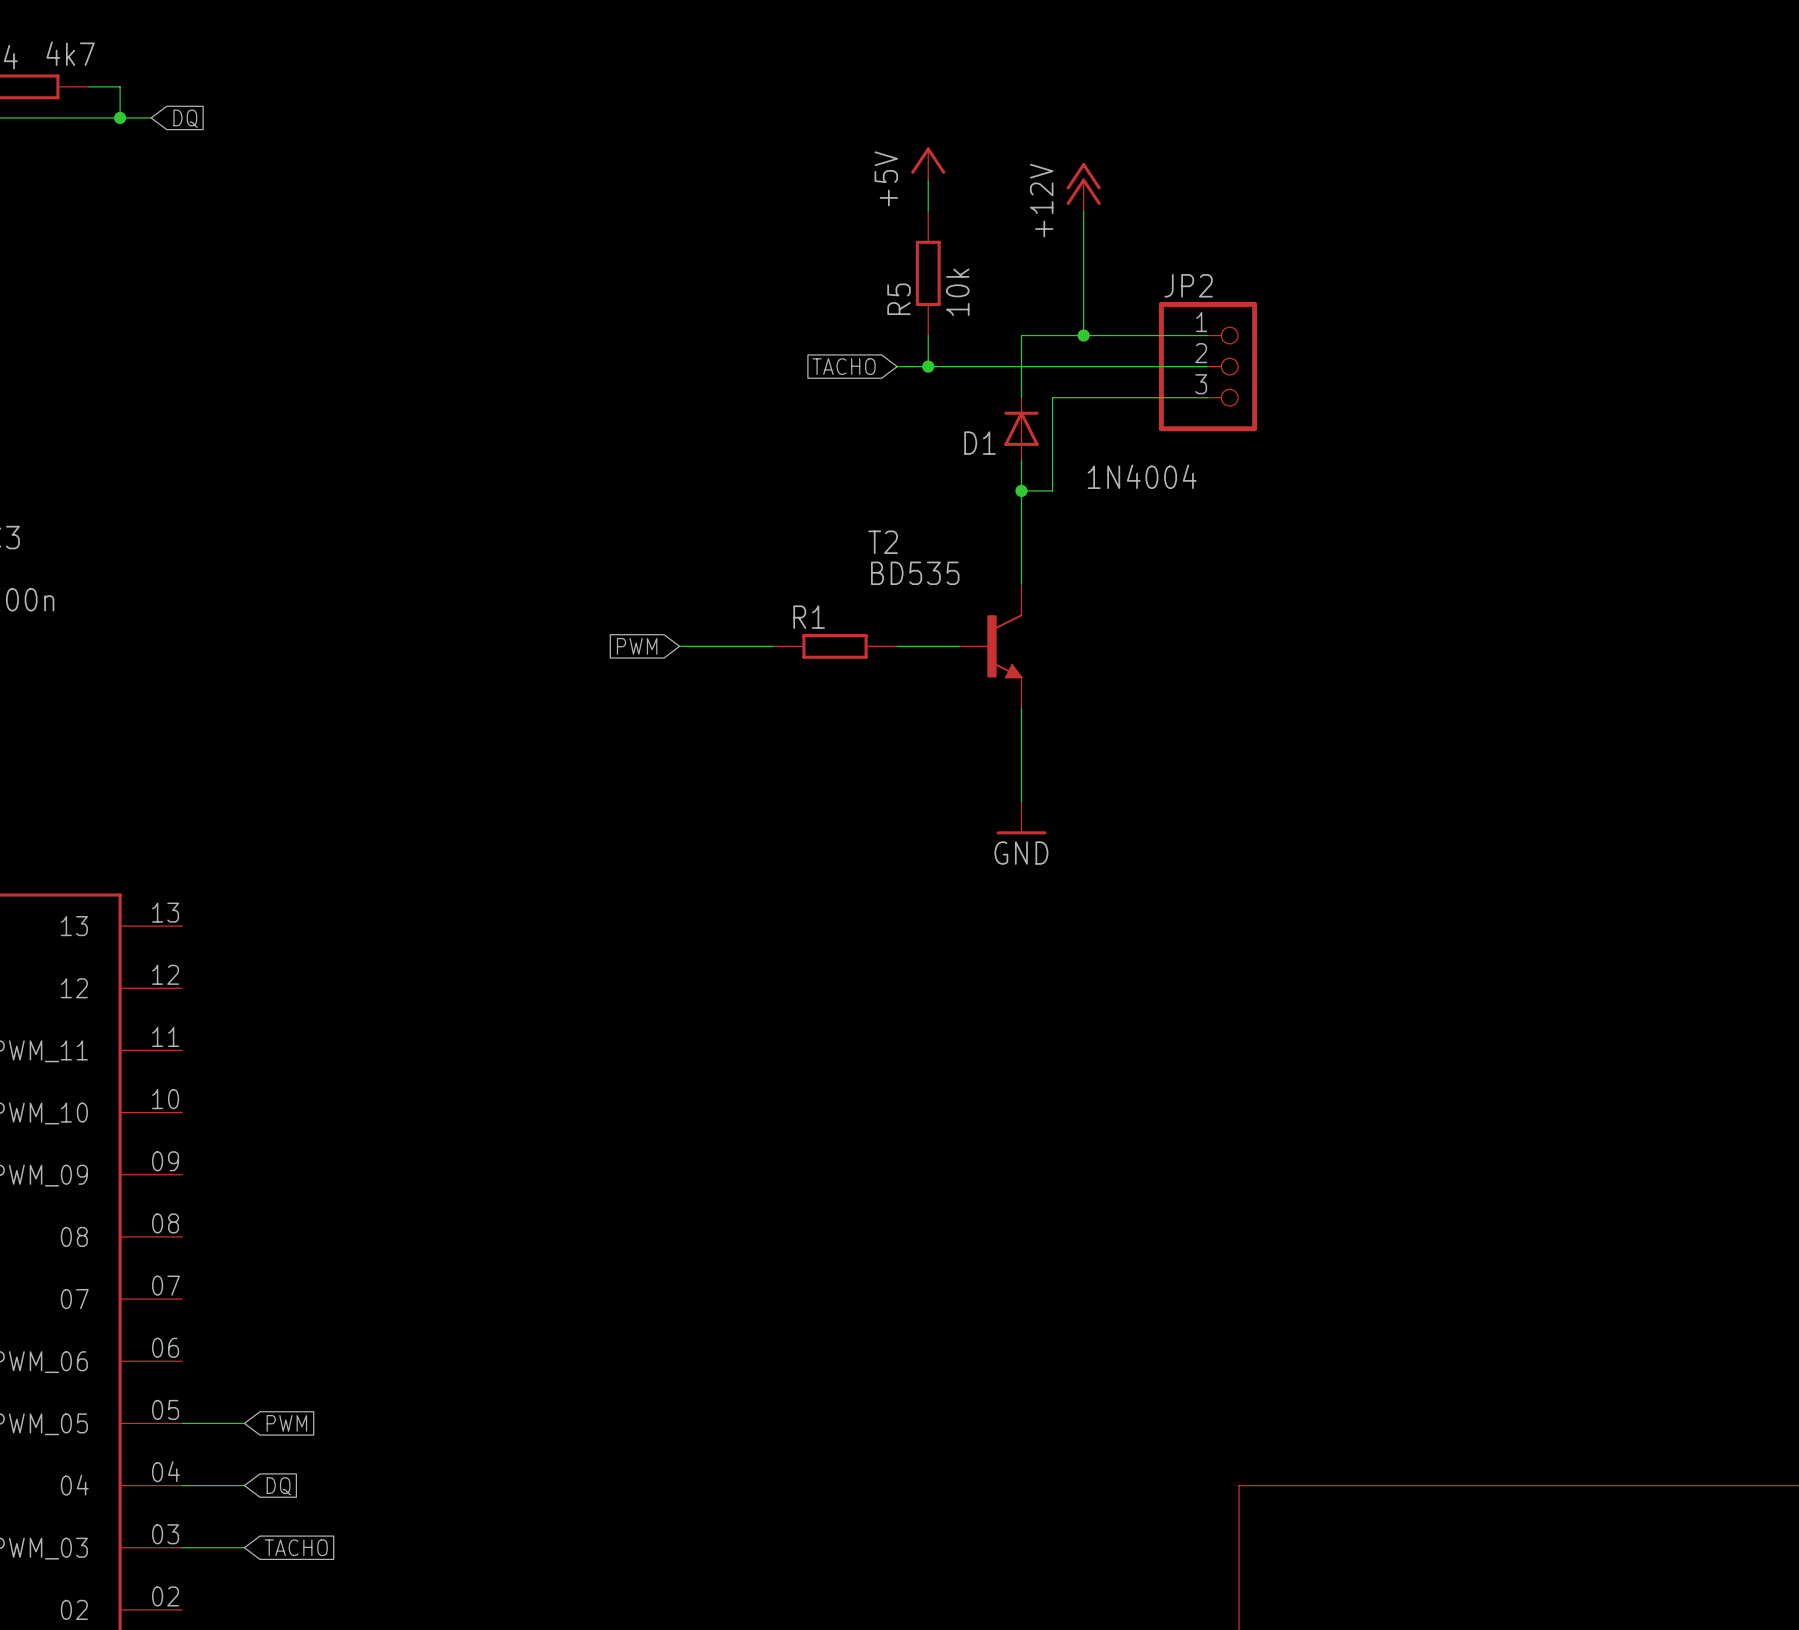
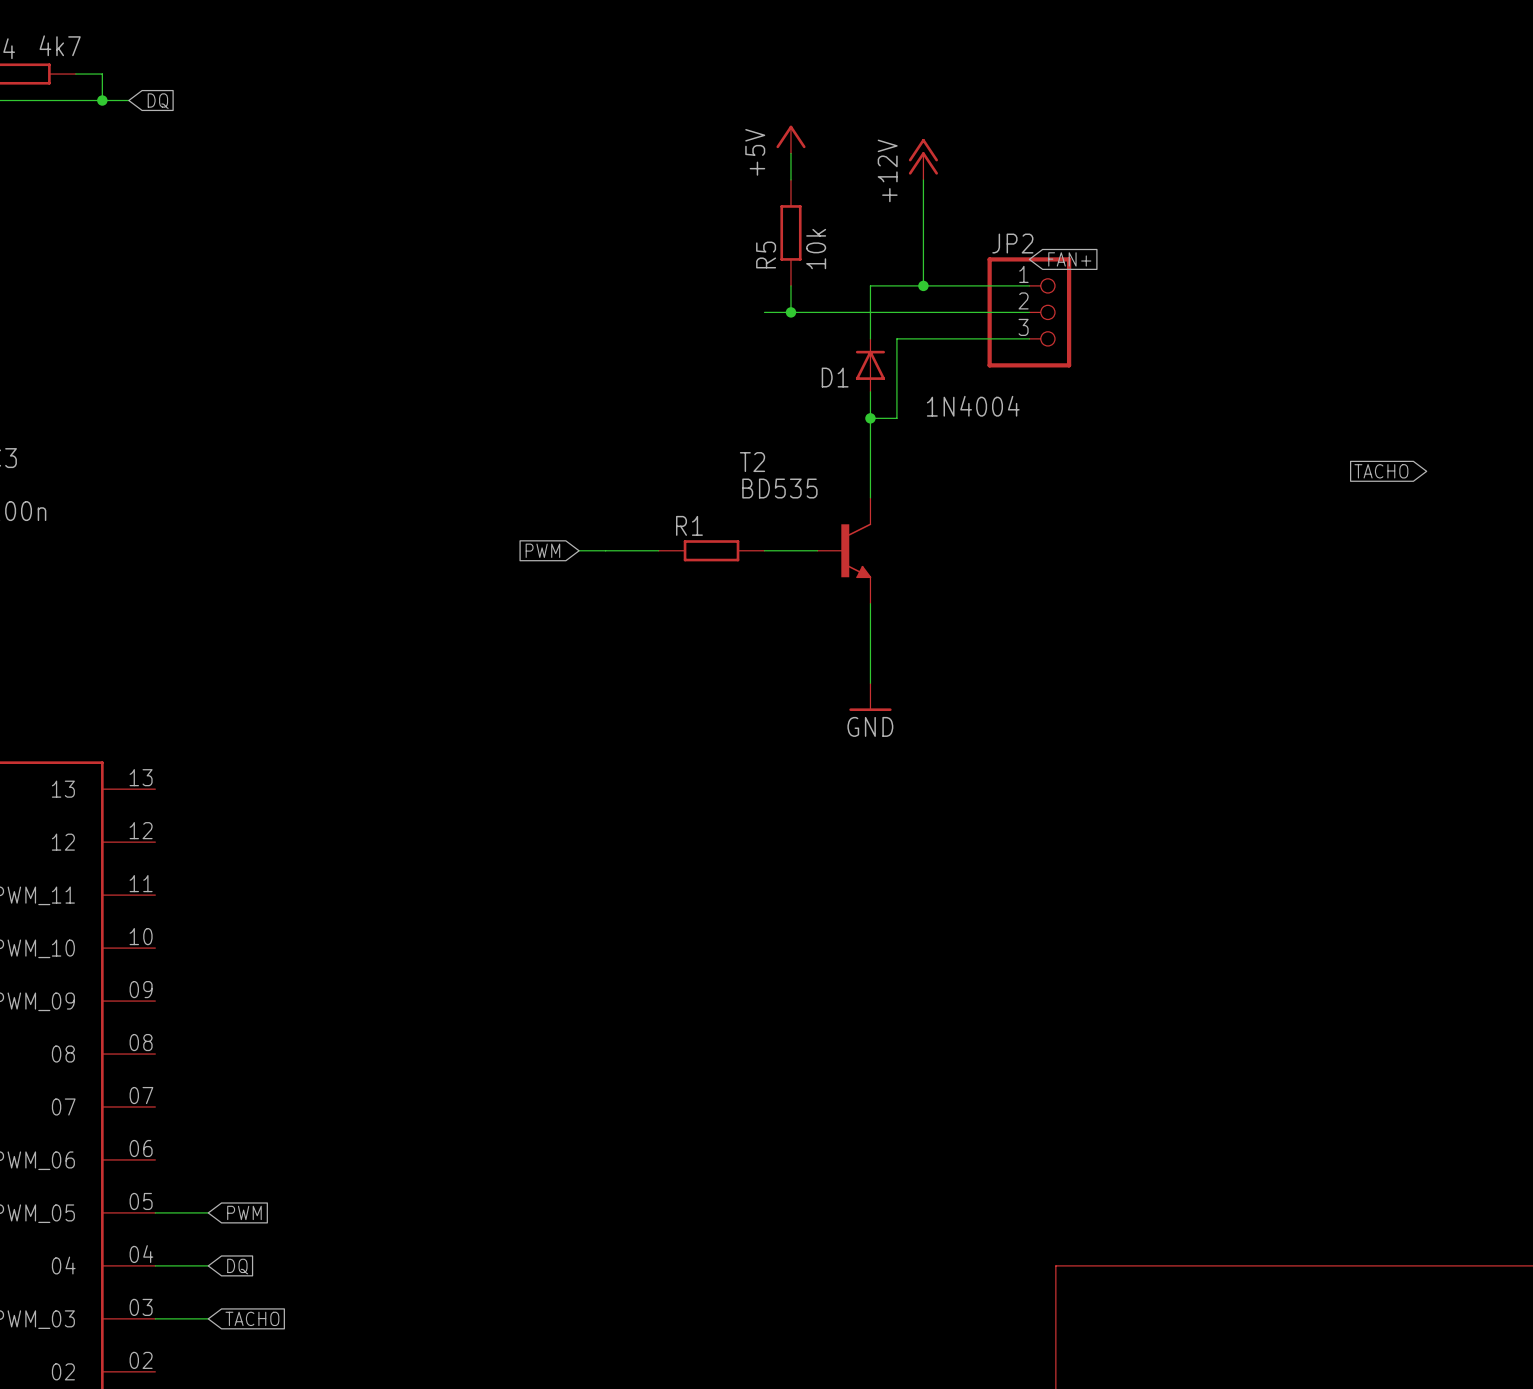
global label: none -> FAN+ (1069, 259)
global label: TACHO (844, 366) -> none
global label: none -> TACHO (1381, 471)

